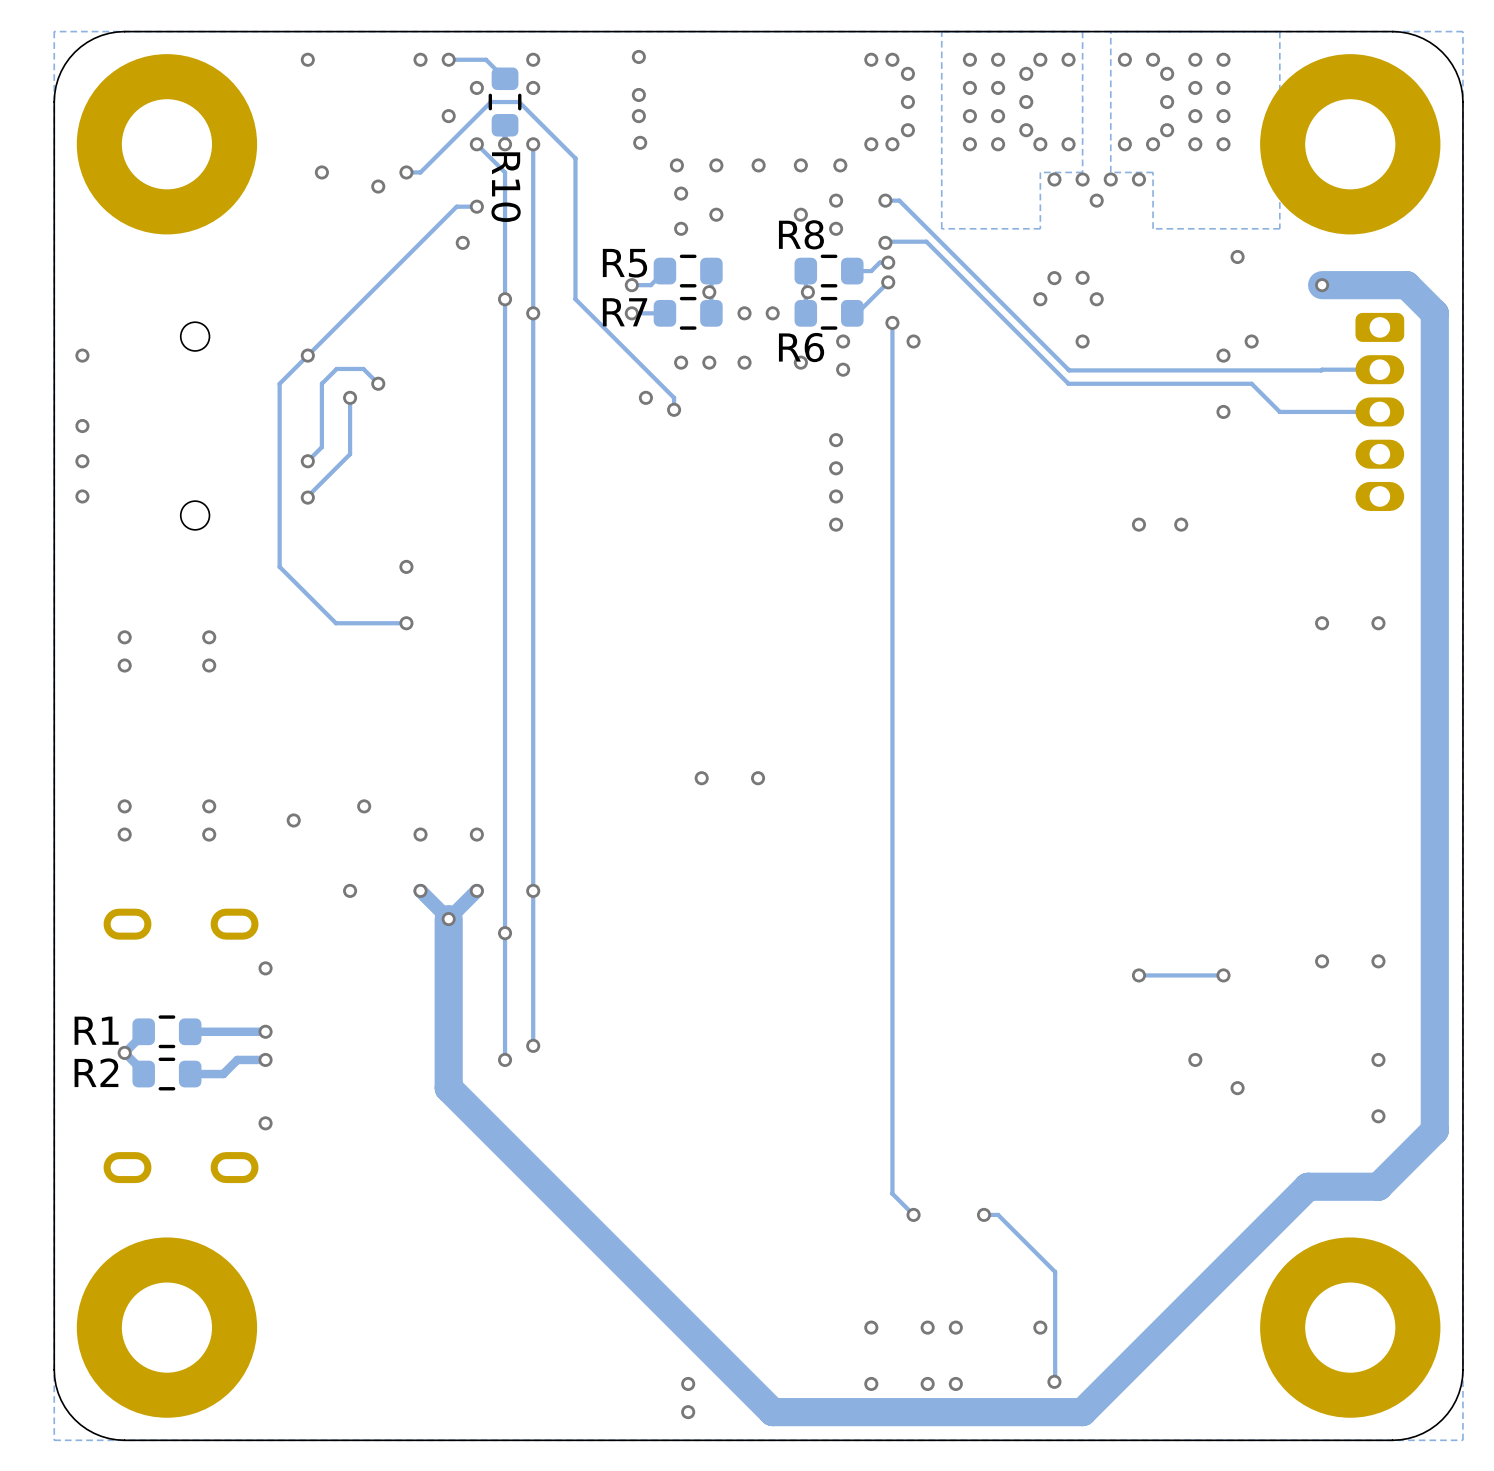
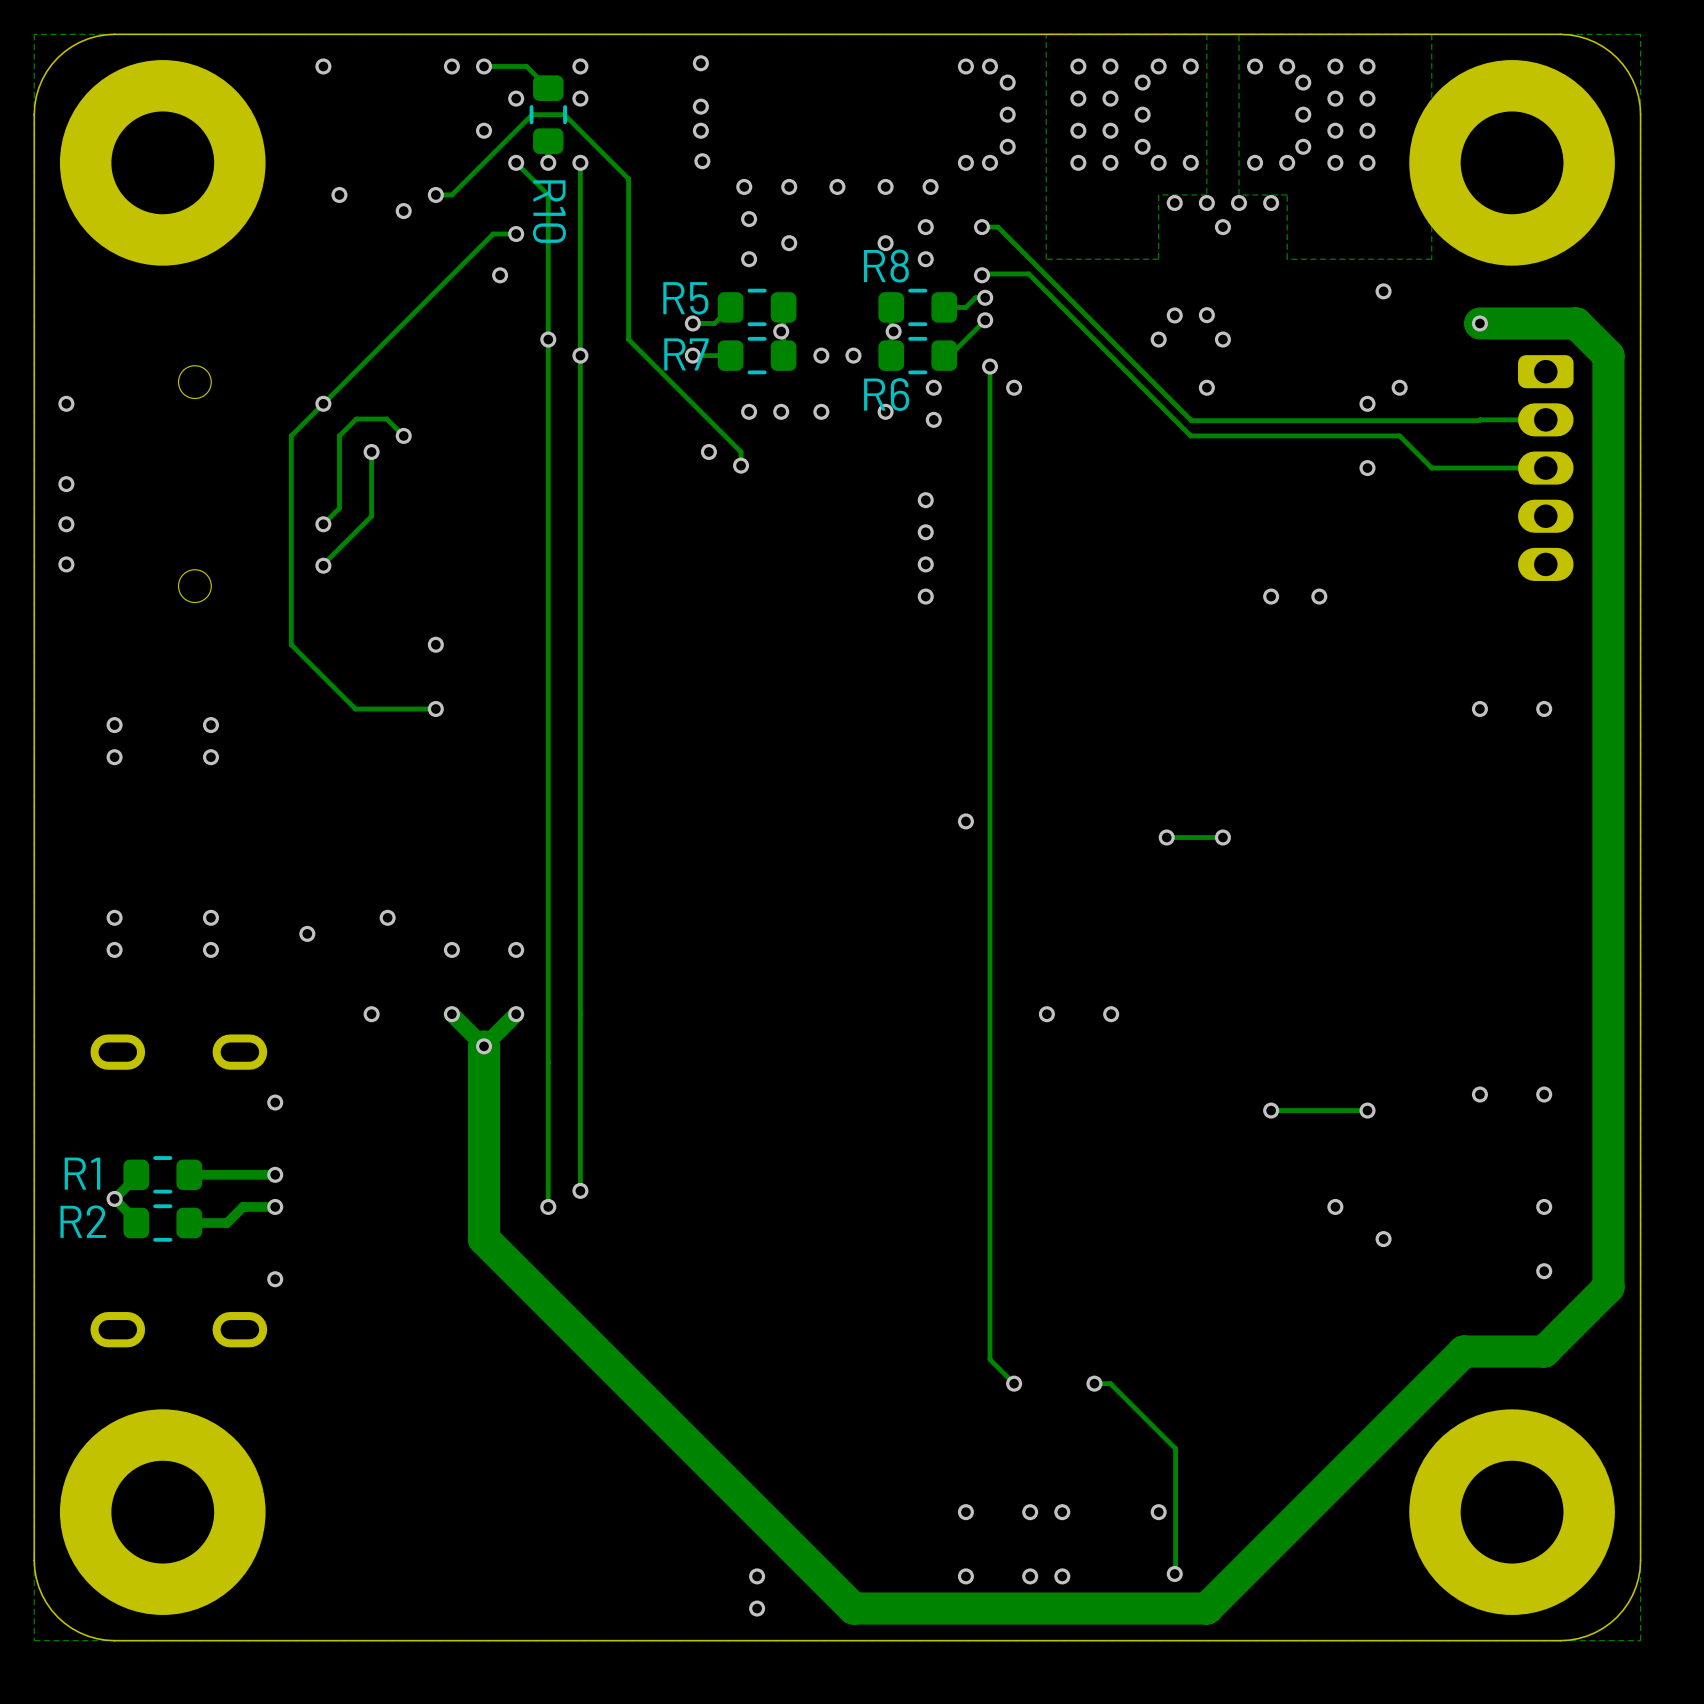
via: none -> (965, 821)
via: none -> (1166, 837)
track: none -> (1222, 837) (1166, 837)
via: none -> (1222, 837)
via: (701, 778) -> none
via: (758, 778) -> none
via: (533, 890) -> none
via: none -> (1046, 1014)
via: none -> (1111, 1014)
via: (505, 933) -> none

